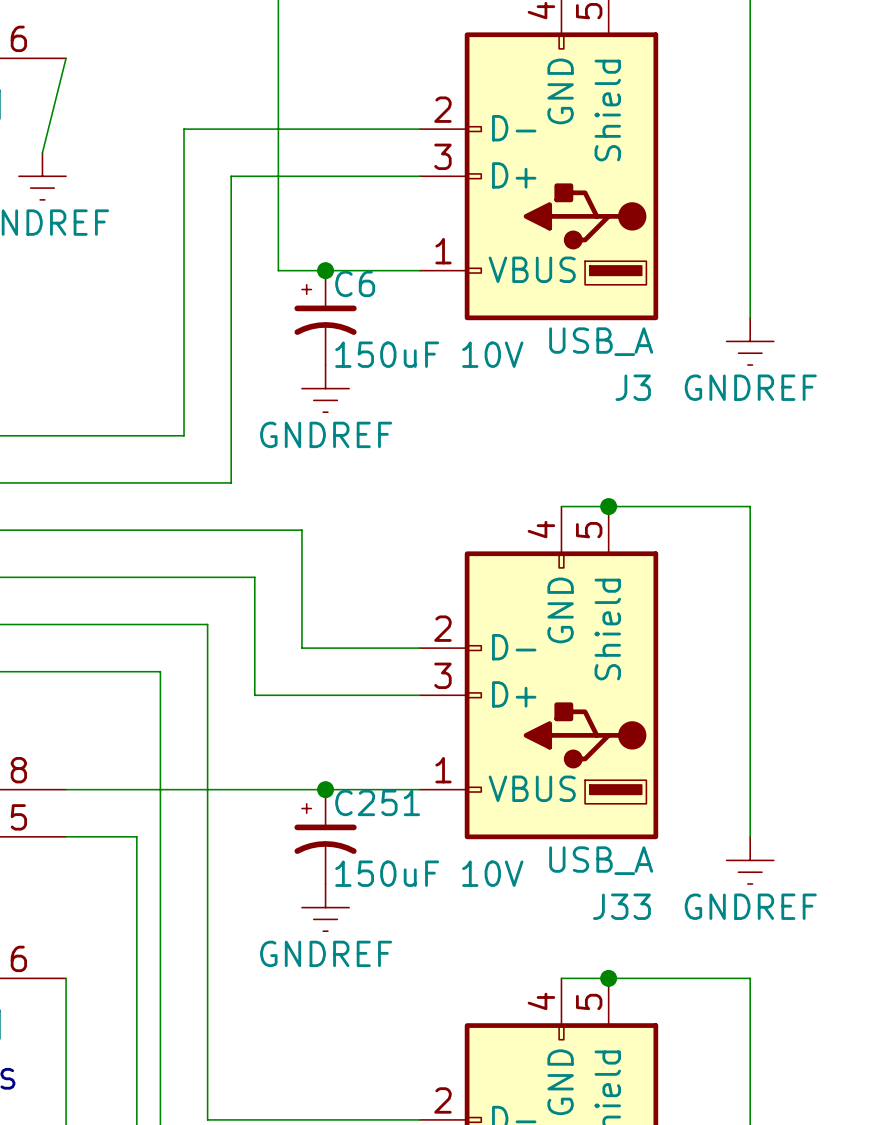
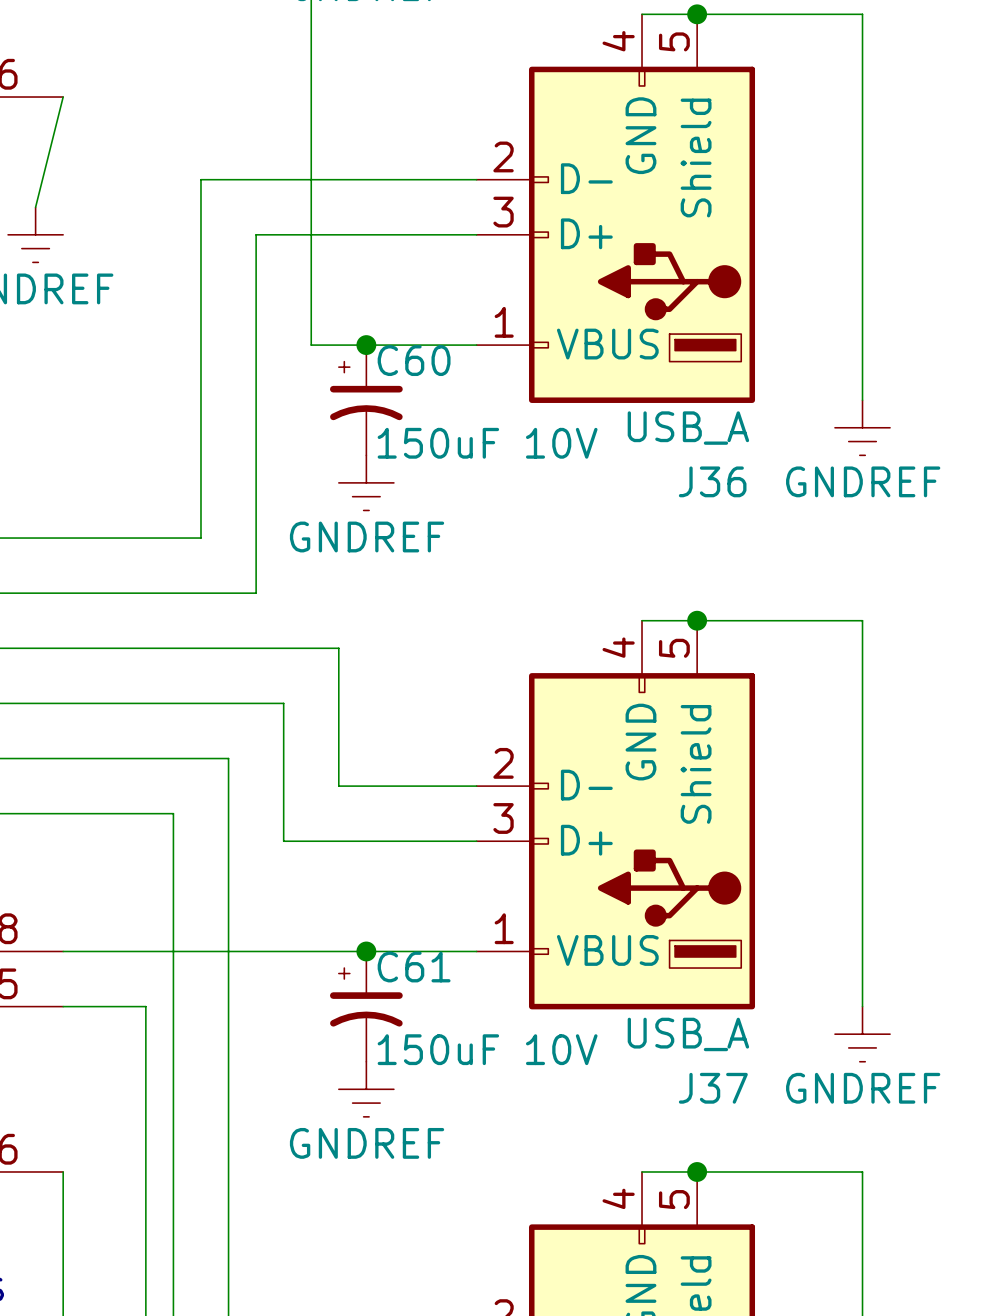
C6 name: C6 (355, 283) -> C60 (414, 360)
J3 name: J3 (633, 387) -> J36 (712, 481)
C251 name: C251 (377, 802) -> C61 (414, 966)
J33 name: J33 (621, 906) -> J37 (713, 1088)

